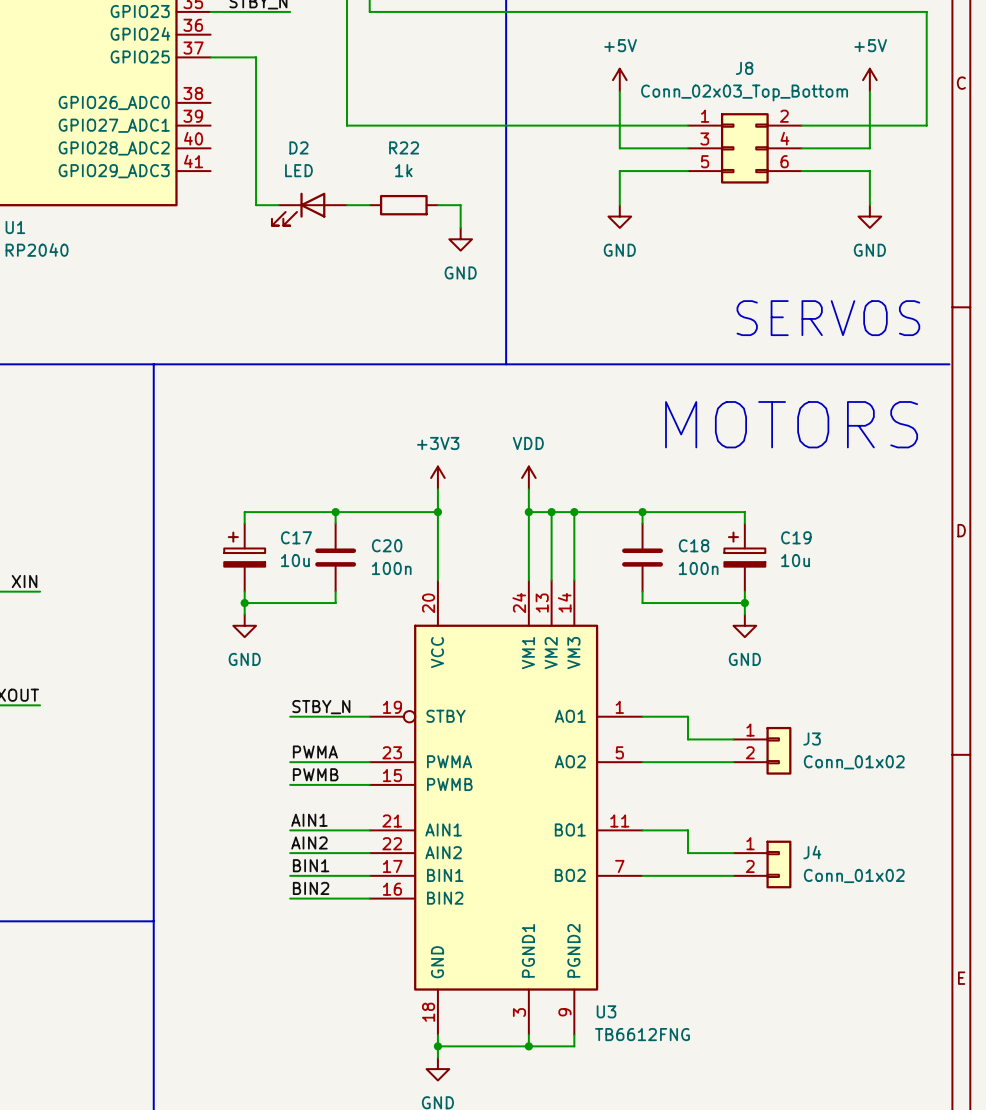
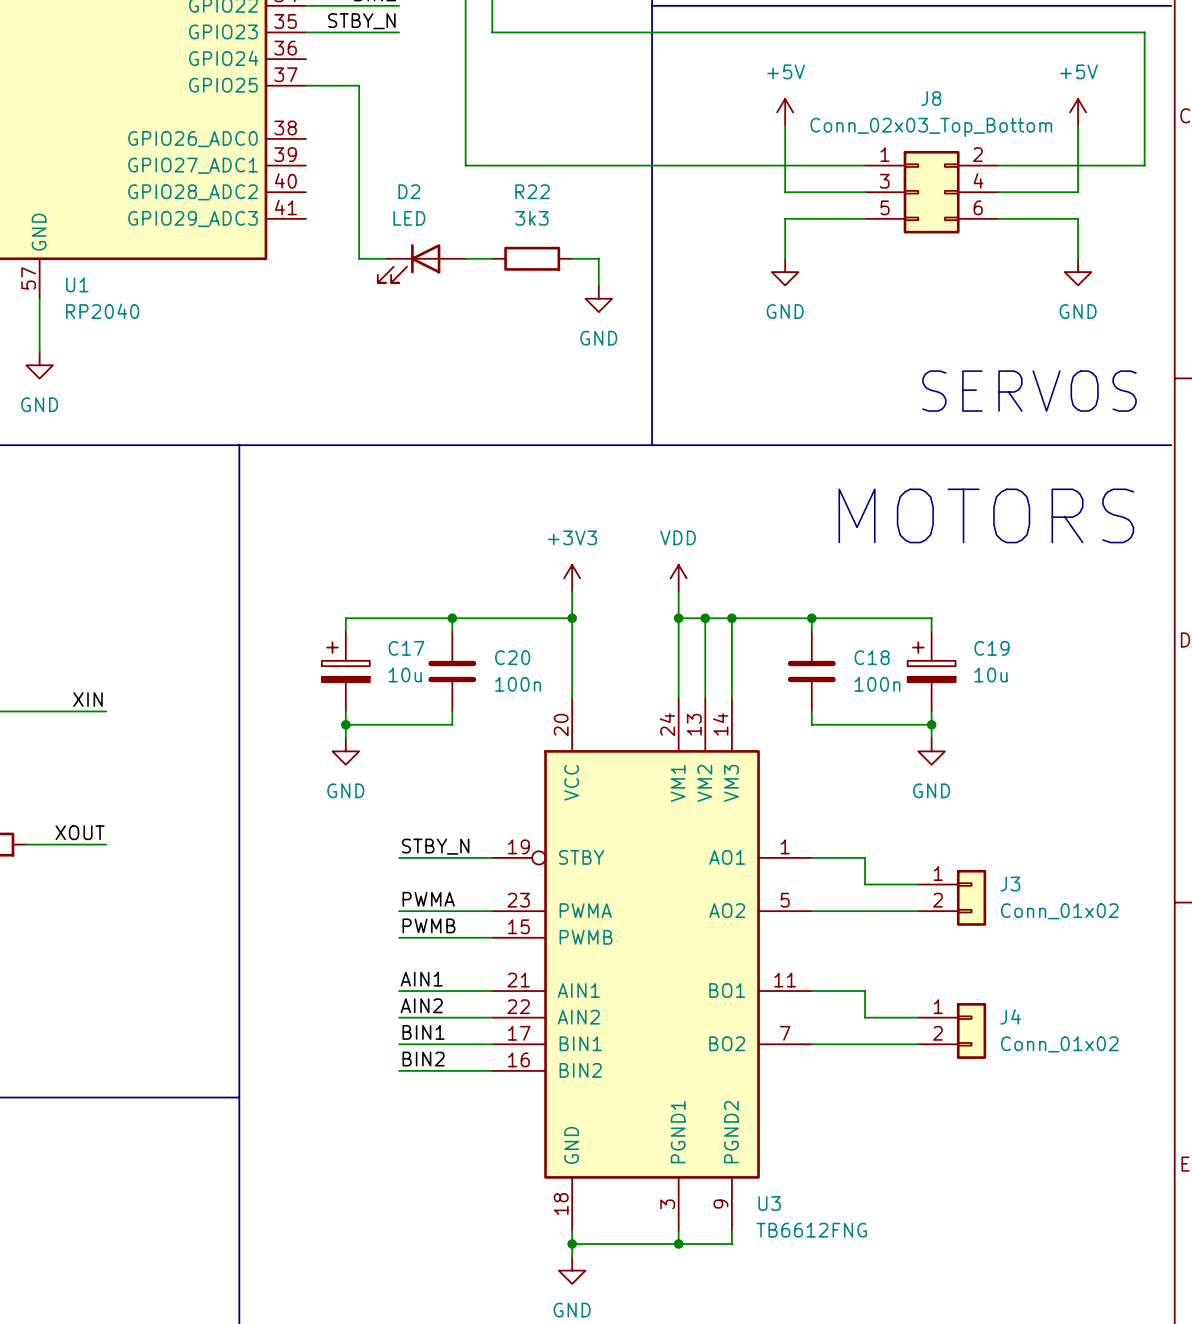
R22 value: 1k (403, 170) -> 3k3 (531, 218)

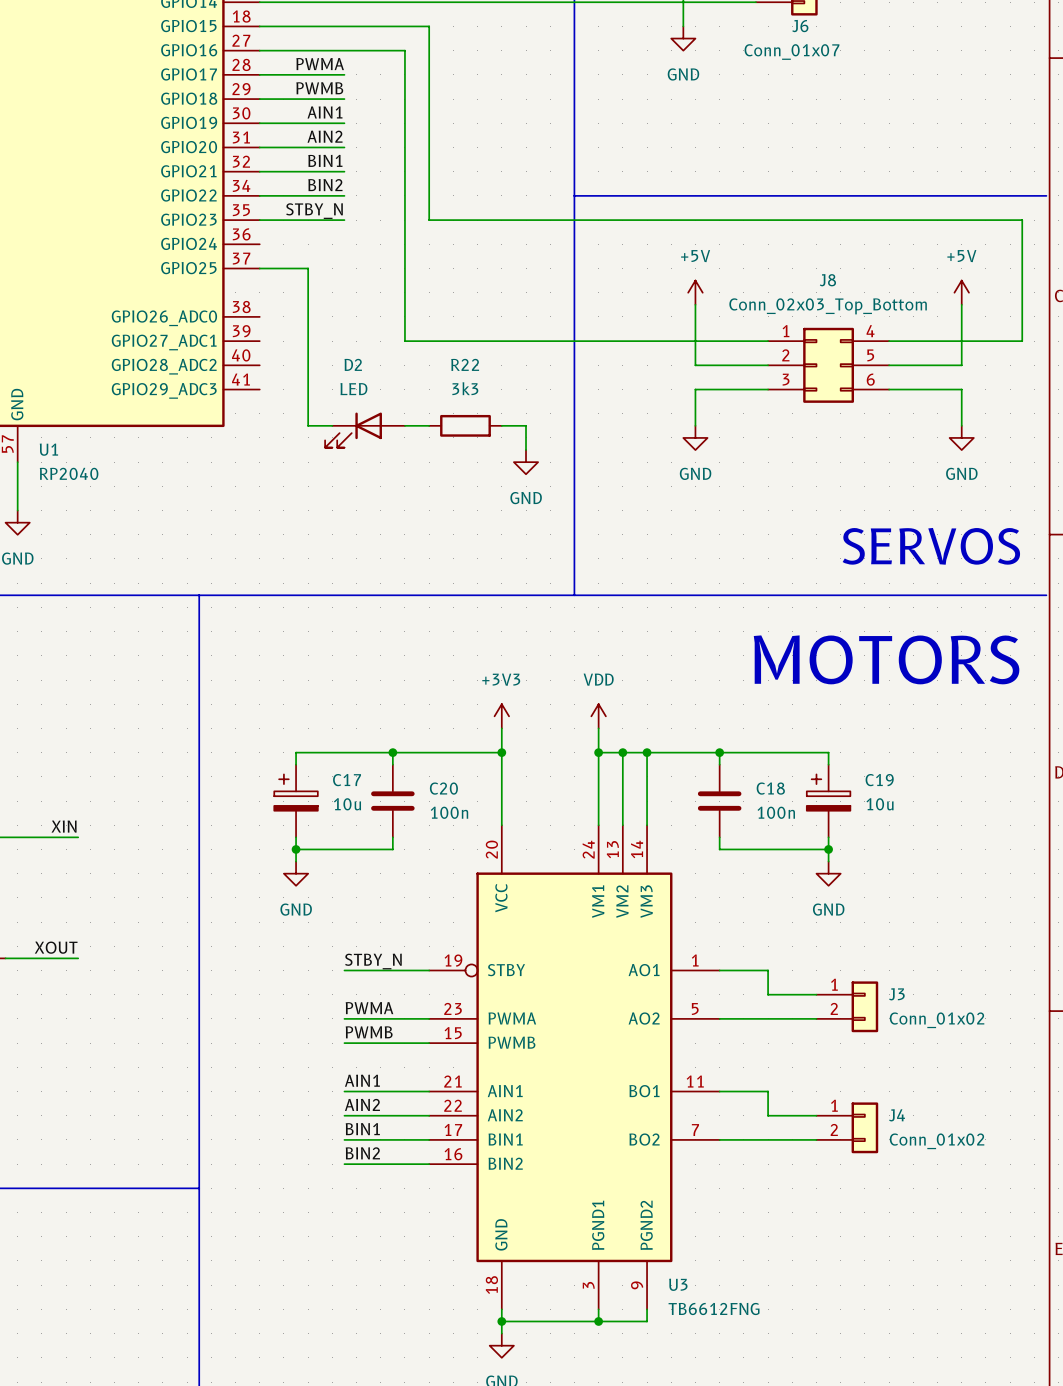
J8 pin number: 2 (977, 154) -> 4 (870, 331)
J8 pin number: 4 (978, 180) -> 5 (870, 355)
J8 pin number: 3 (884, 181) -> 2 (785, 355)
J8 pin number: 5 (885, 207) -> 3 (786, 379)

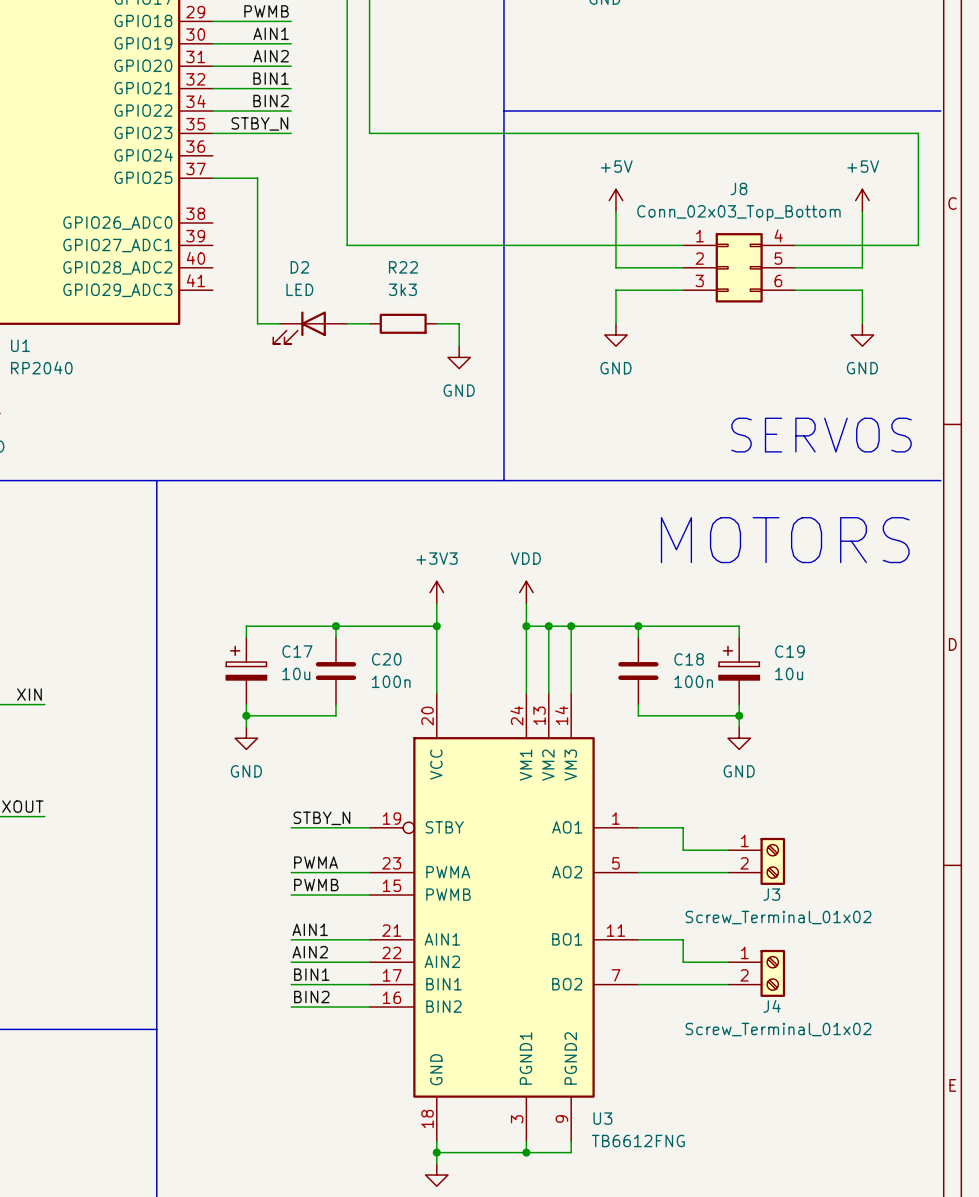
J3 symbol: [816, 981, 879, 1033] -> [727, 837, 786, 885]
J3 name position: J3 (896, 994) -> J3 (771, 894)
J3 value: Conn_01x02 (937, 1020) -> Screw_Terminal_01x02 (778, 917)
J4 symbol: [816, 1102, 879, 1154] -> [727, 949, 786, 997]
J4 name position: J4 (897, 1115) -> J4 (772, 1006)
J4 value: Conn_01x02 (937, 1141) -> Screw_Terminal_01x02 (778, 1029)

